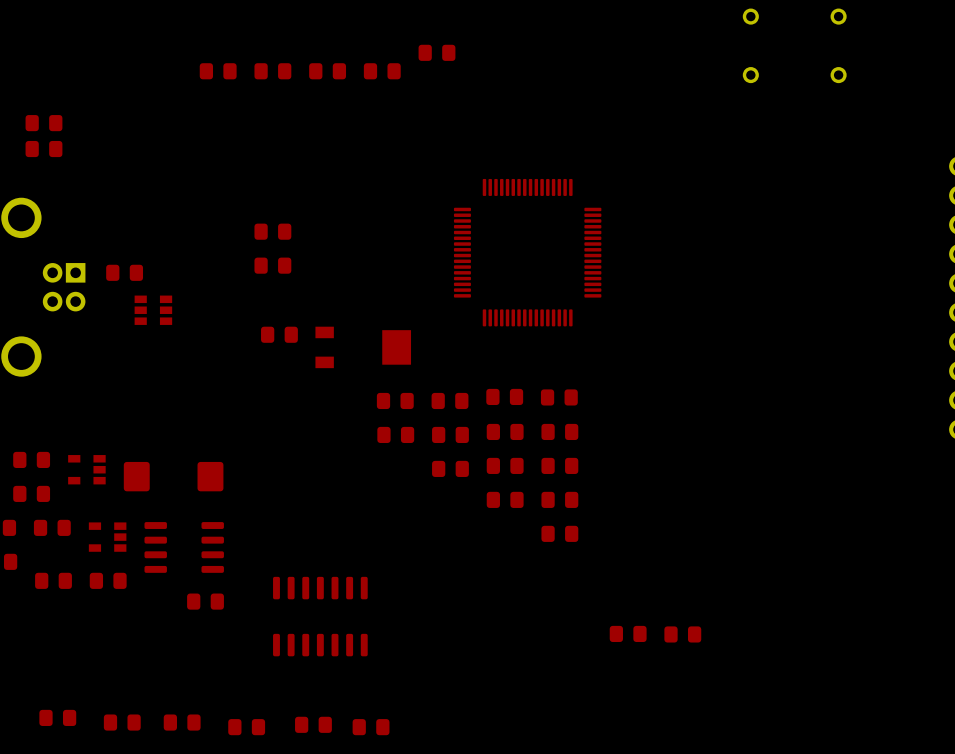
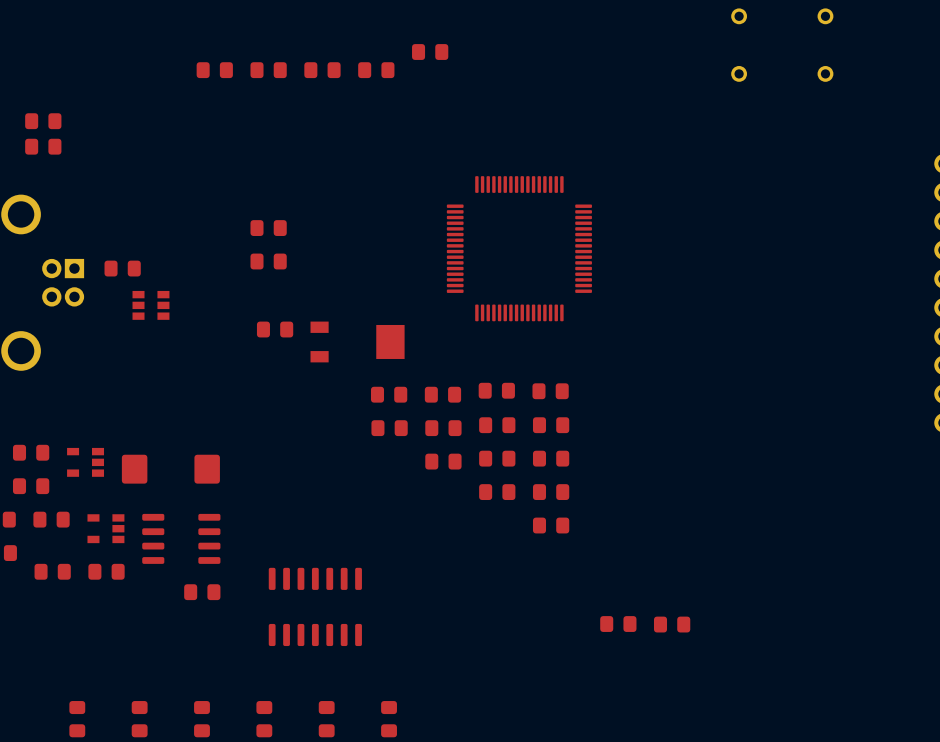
part: (57, 717) -> none
part: (122, 722) -> none
part: (182, 722) -> none
part rotation: 0° (313, 724) -> 90° clockwise (326, 719)
part: (246, 727) -> none
part: (371, 727) -> none
part: none -> (77, 719)
part: none -> (139, 719)
part: none -> (201, 719)
part: none -> (264, 719)
part: none -> (389, 719)

